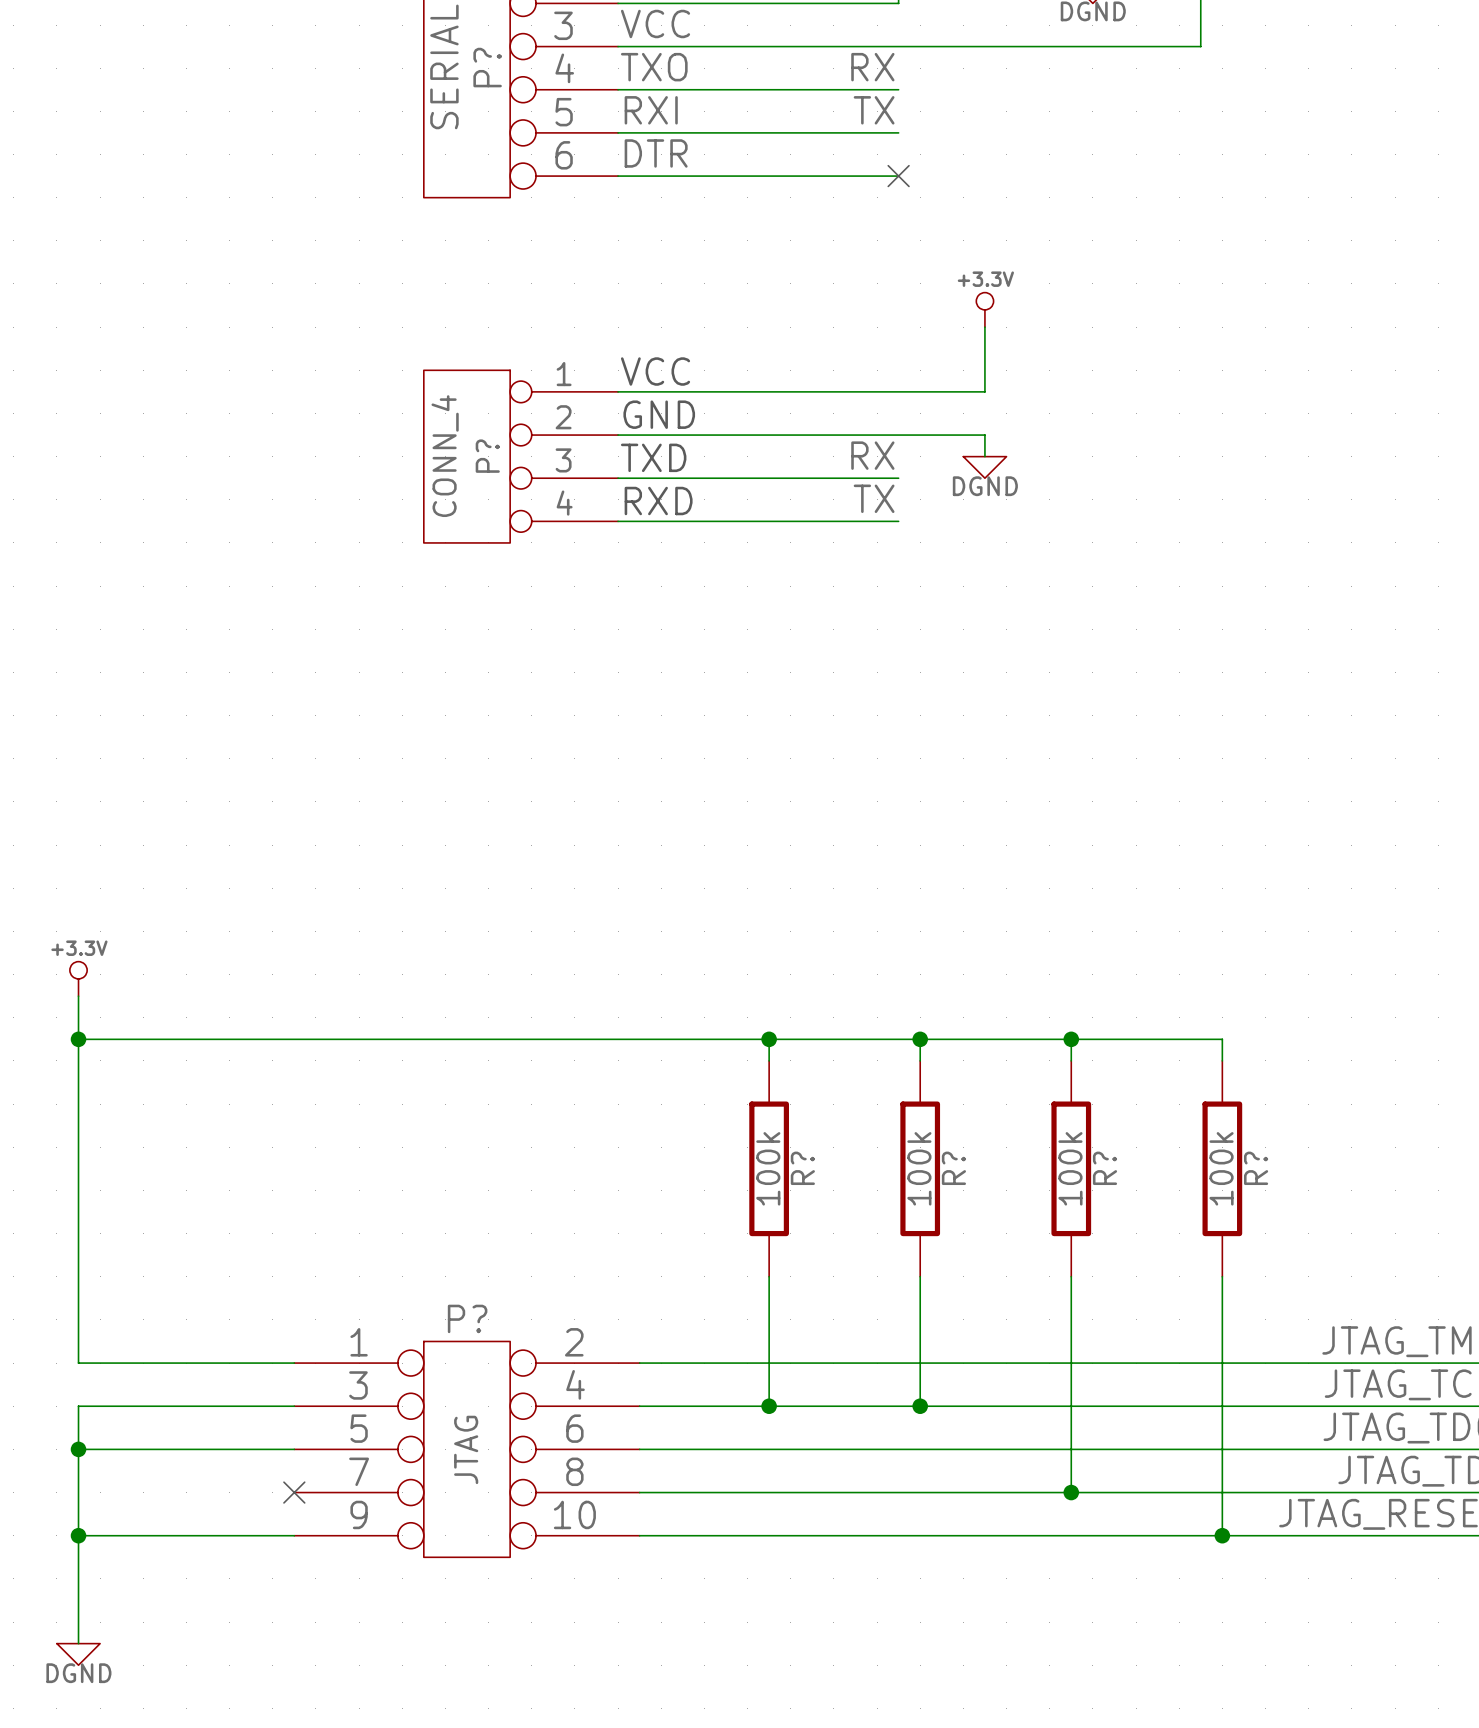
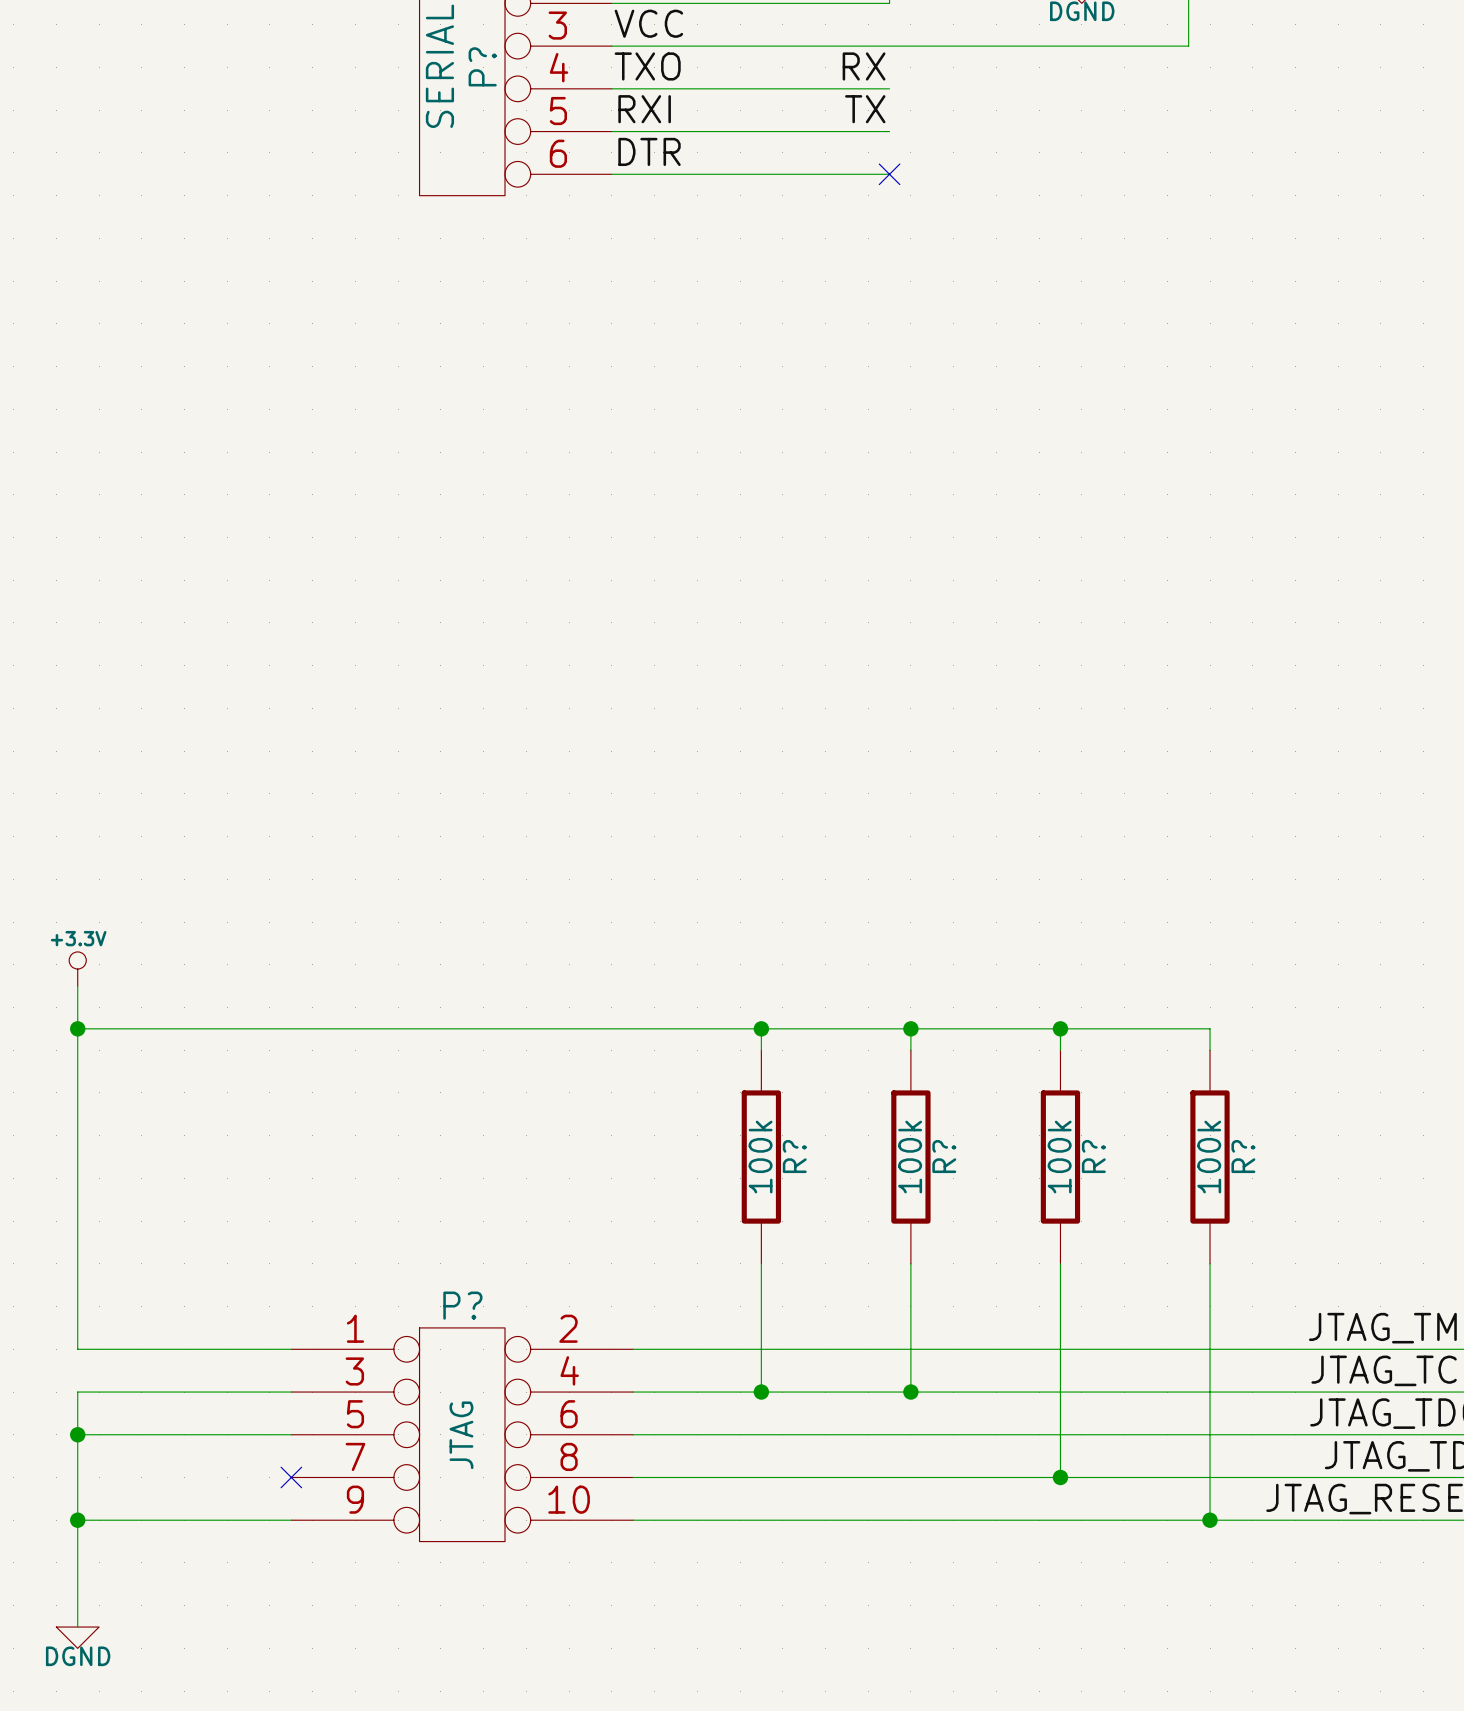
power symbol: +3.3V (984, 309) -> none
wire: (984, 327) (984, 391) (618, 391) -> none
text: VCC (655, 371) -> none
text: GND (659, 414) -> none
wire: (618, 435) (984, 435) (984, 456) -> none
label: RX (872, 455) -> none
P?: CONN_4 (520, 456) -> none
text: TXD (653, 457) -> none
power symbol: DGND (984, 467) -> none
wire: (618, 478) (898, 478) -> none
label: TX (874, 498) -> none
text: RXD (658, 501) -> none
wire: (618, 521) (898, 521) -> none

